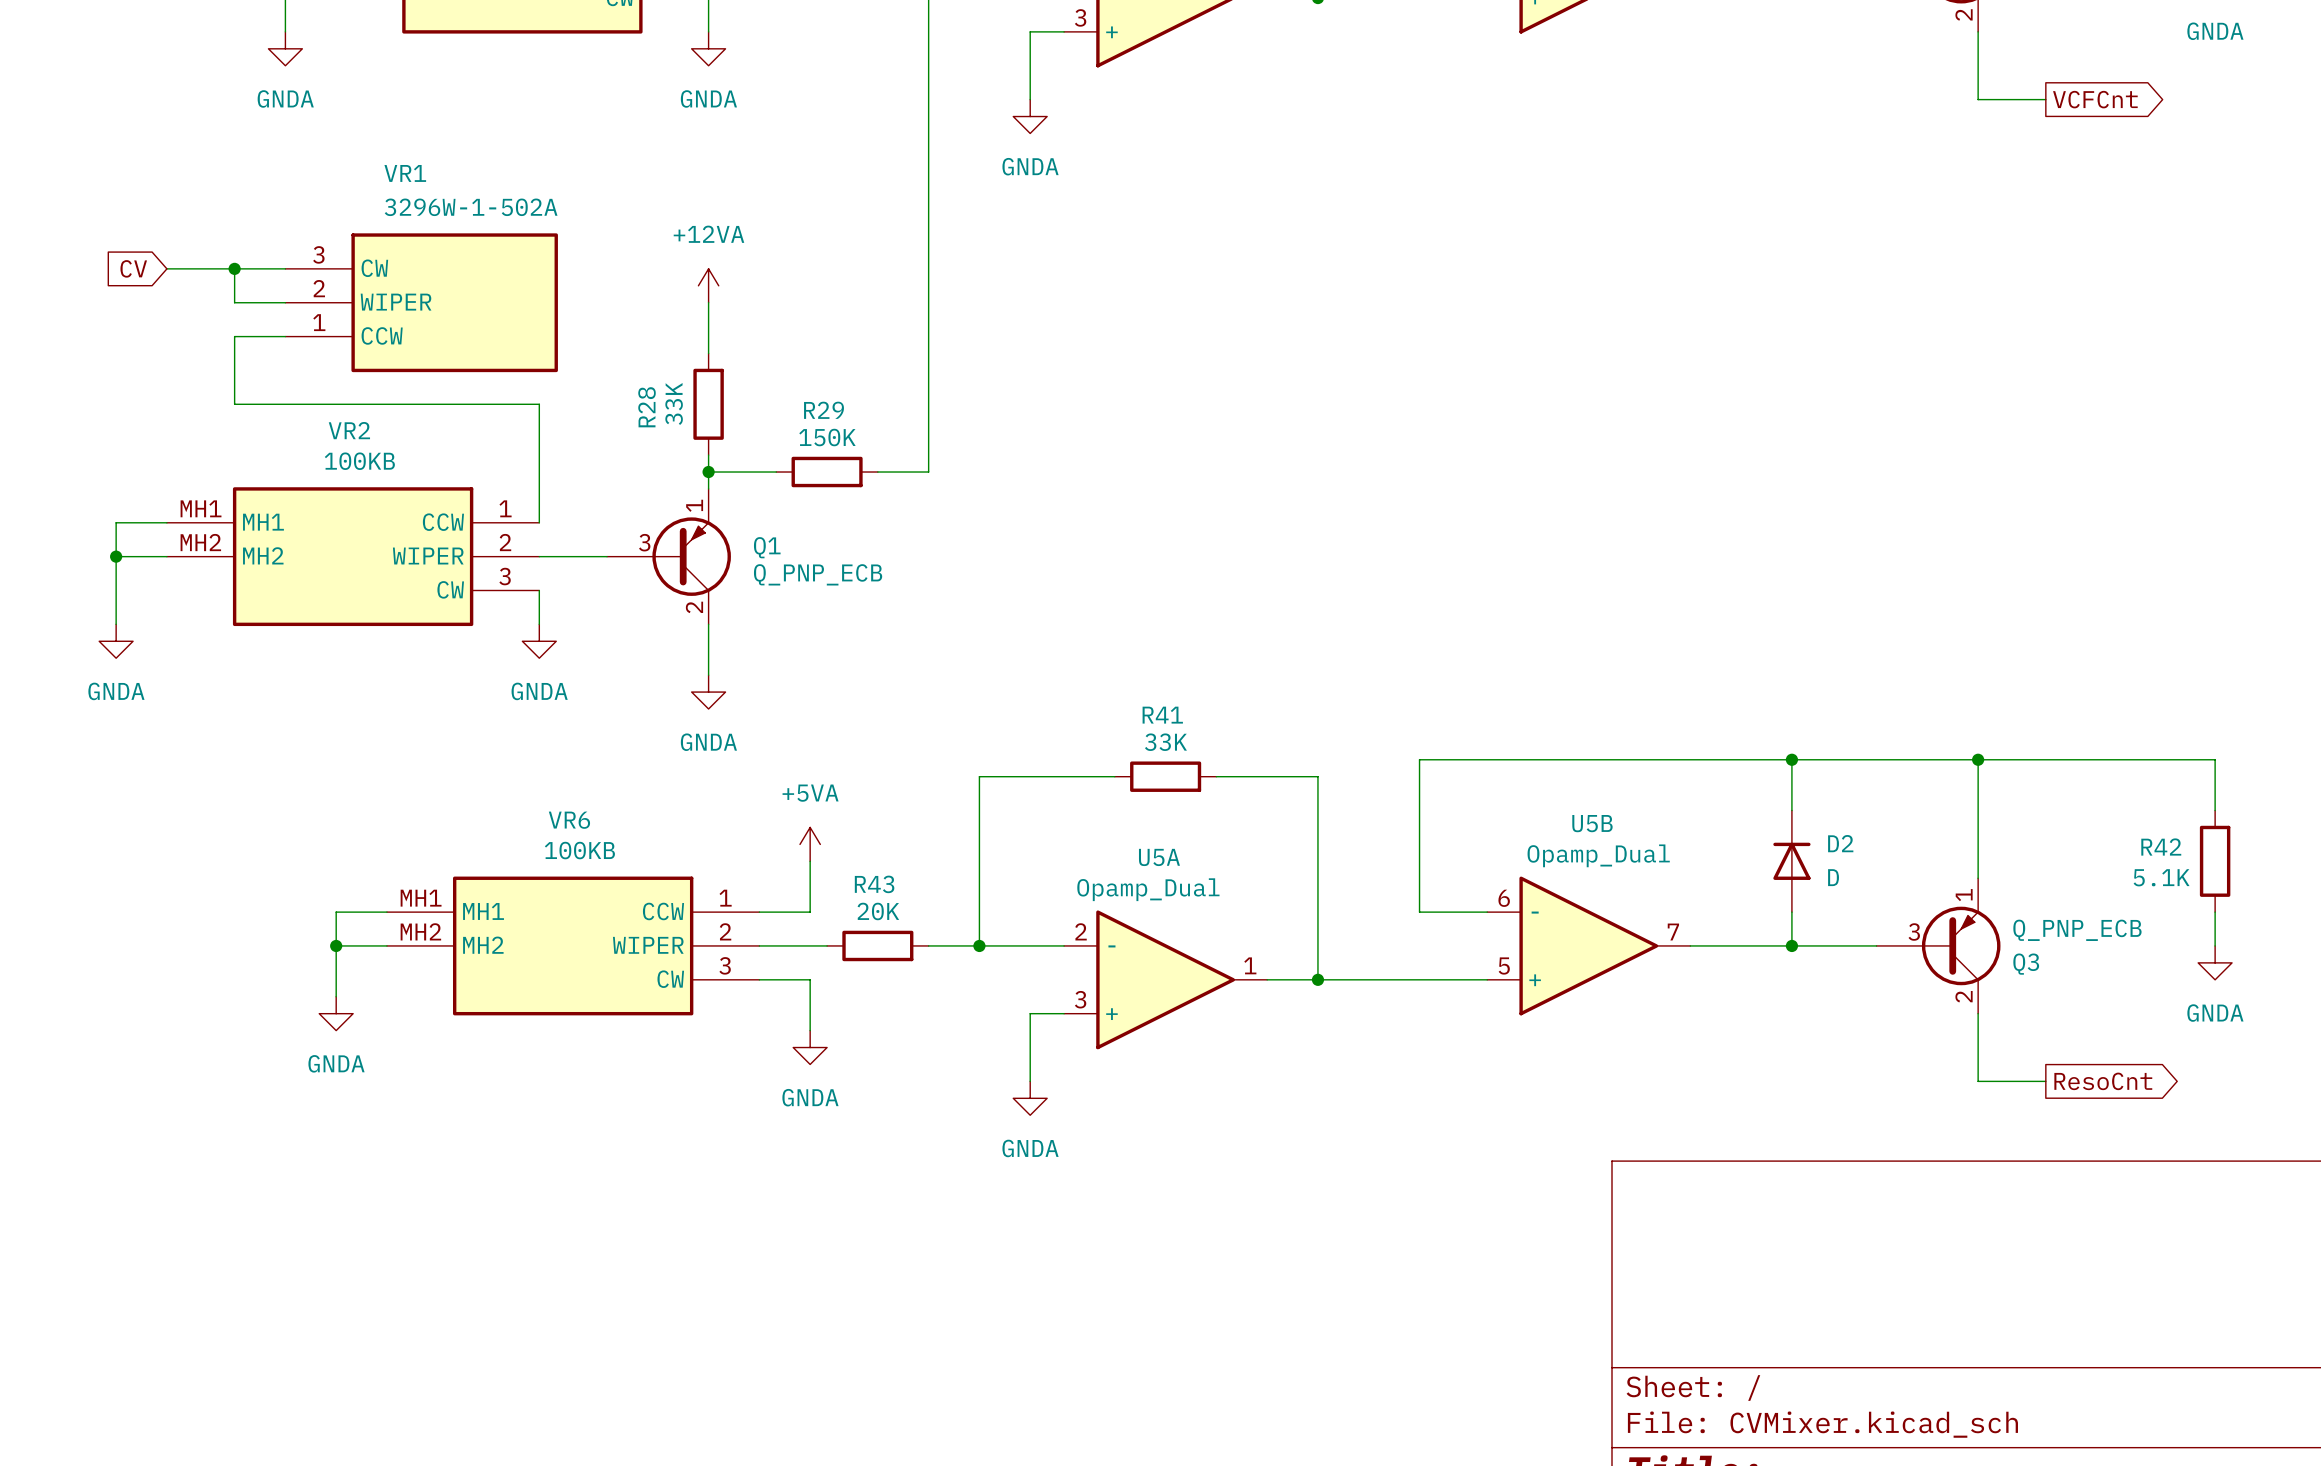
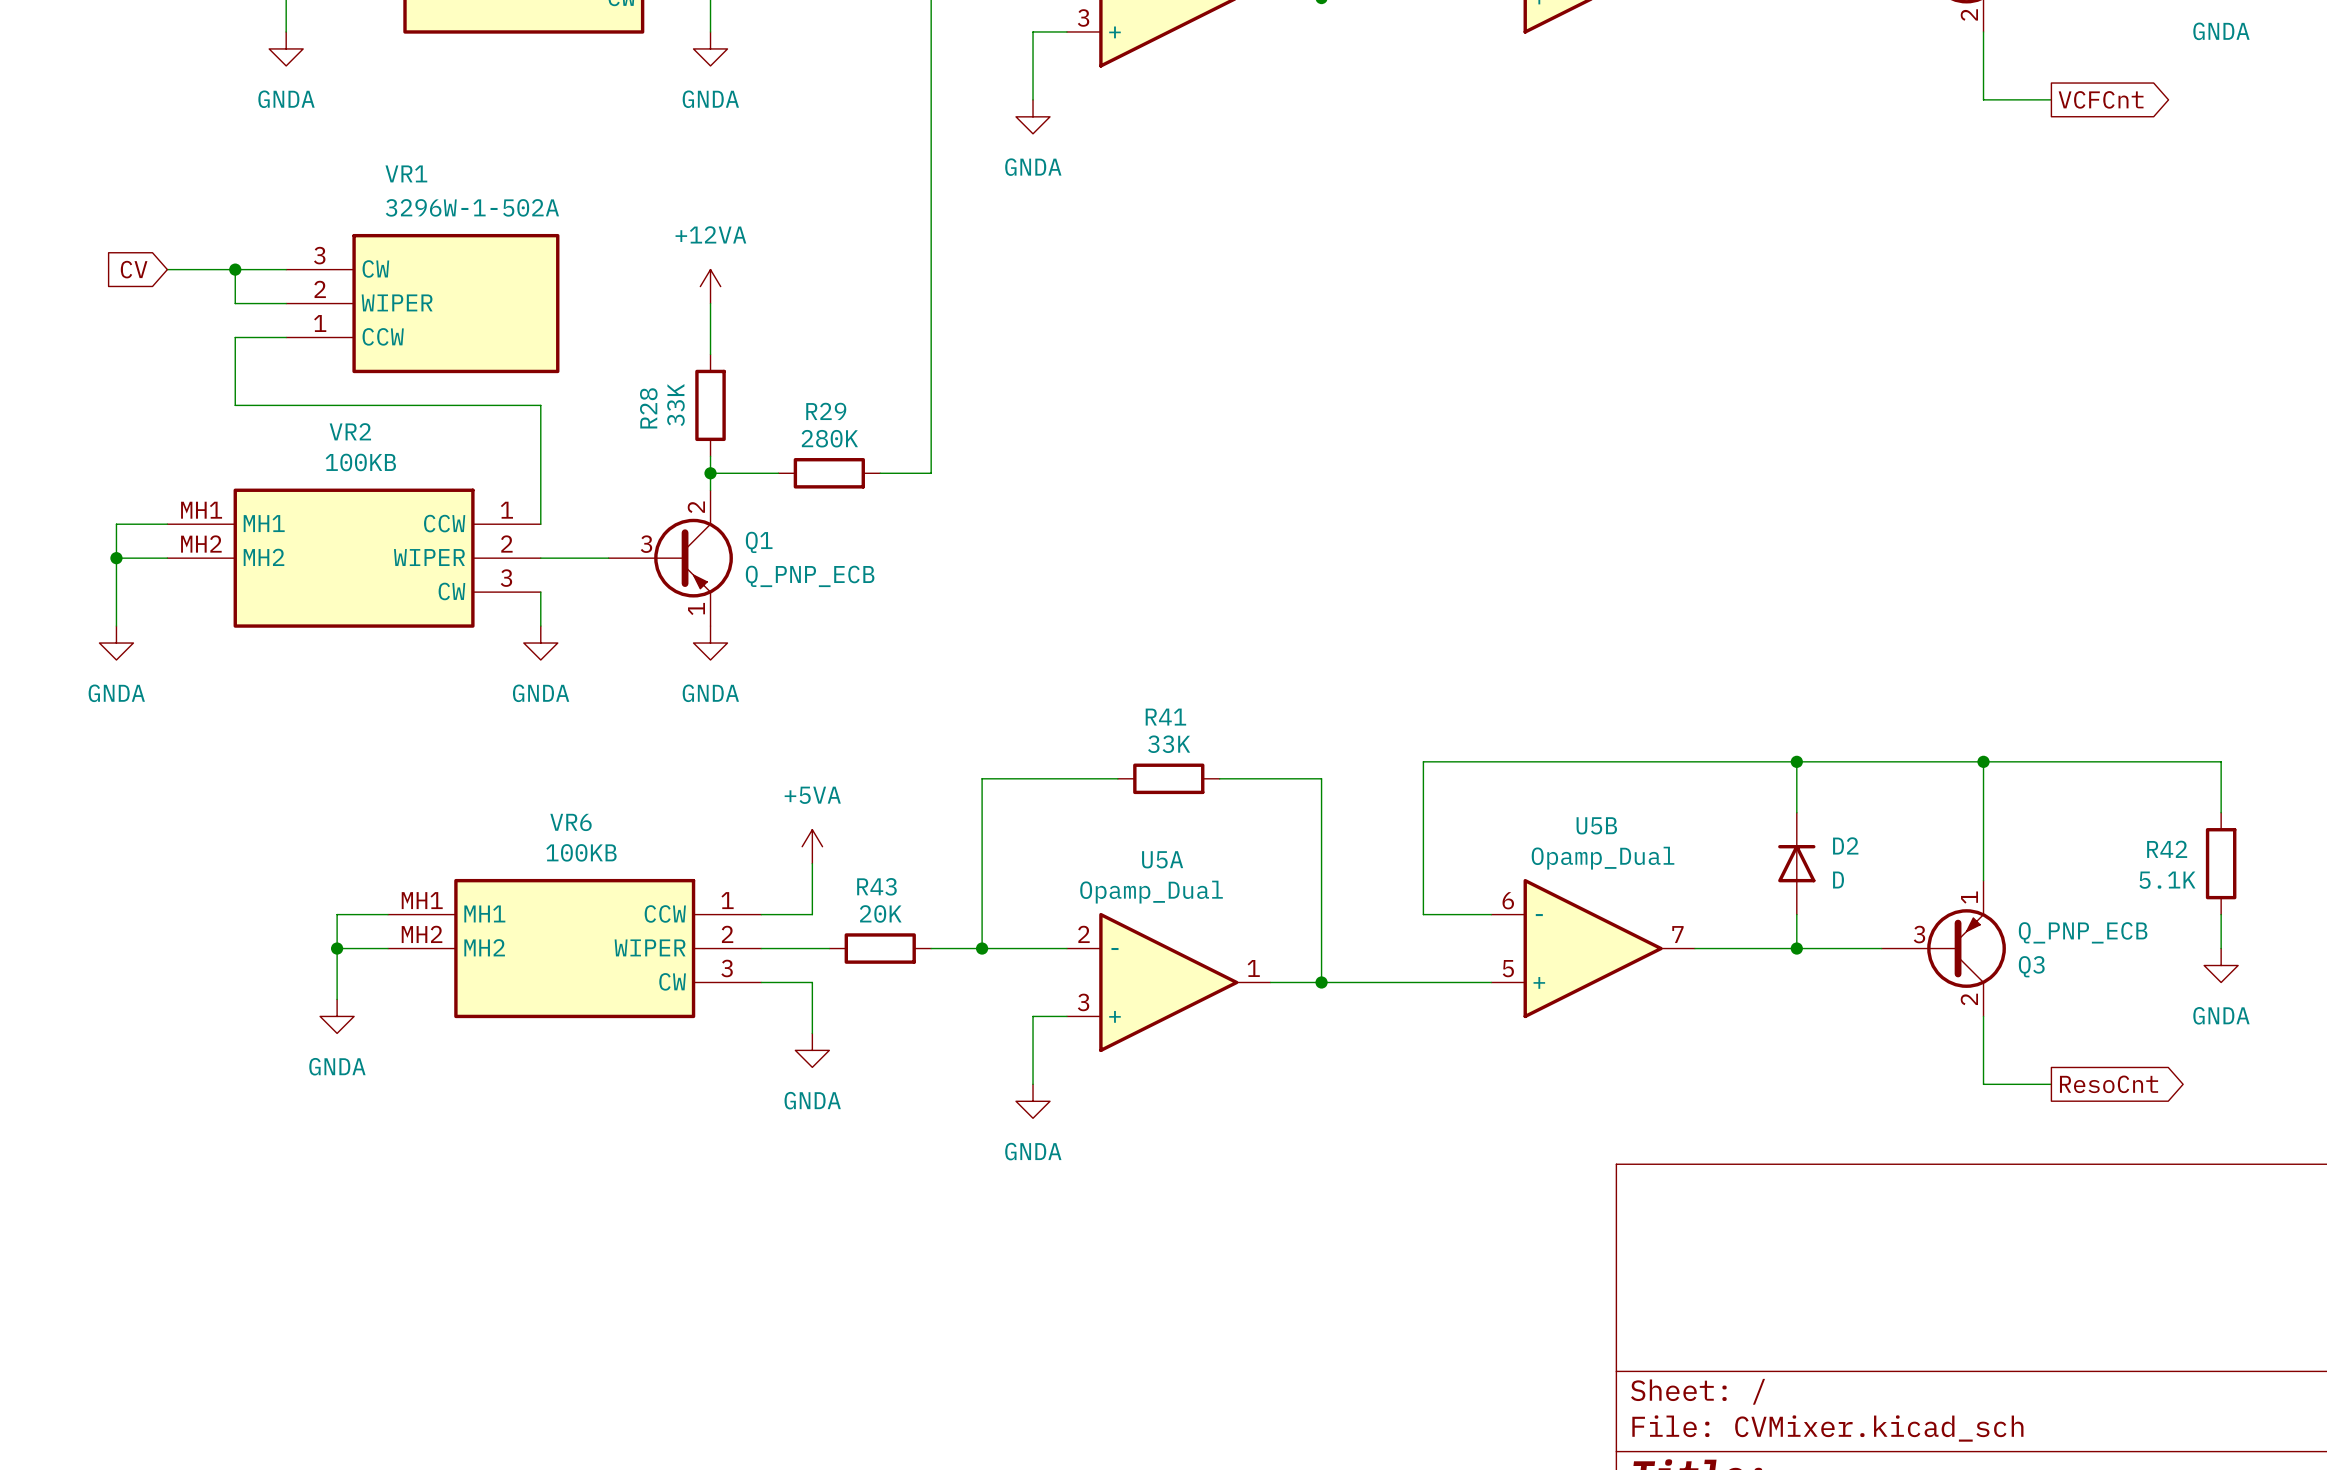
R29 value: 150K (827, 437) -> 280K (829, 438)
Q1 flip: as is (691, 556) -> up-down (693, 558)
wire: (708, 624) (708, 675) -> none
power symbol position: GNDA (708, 692) -> GNDA (710, 643)

